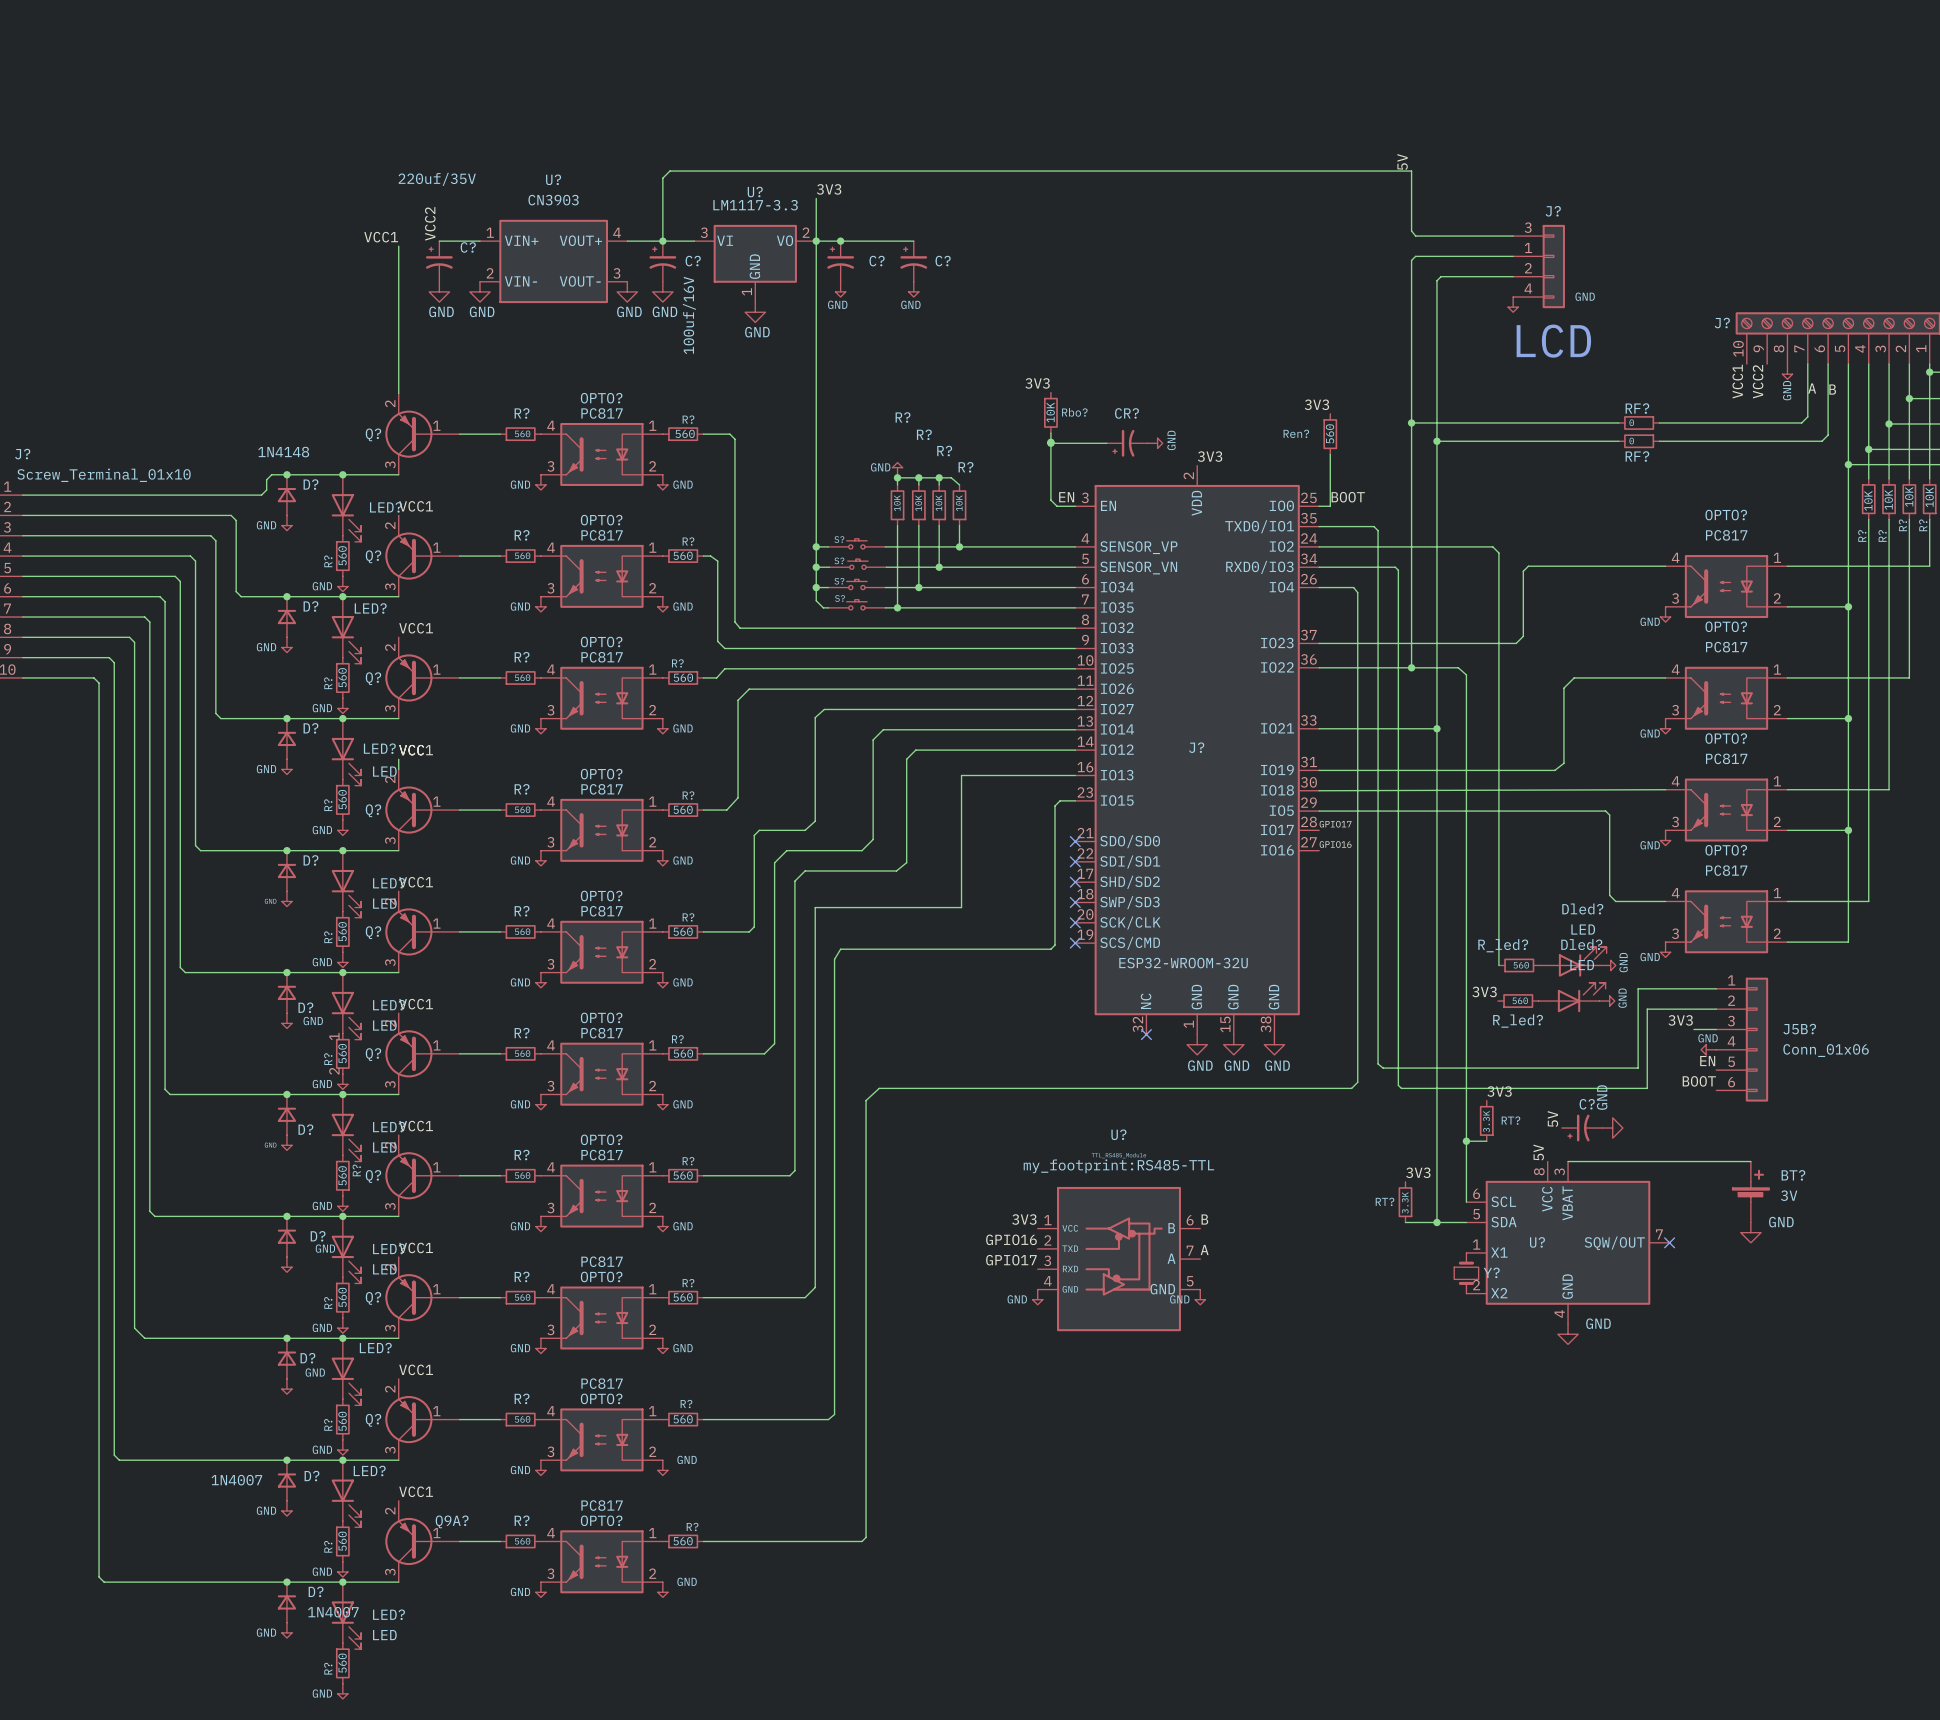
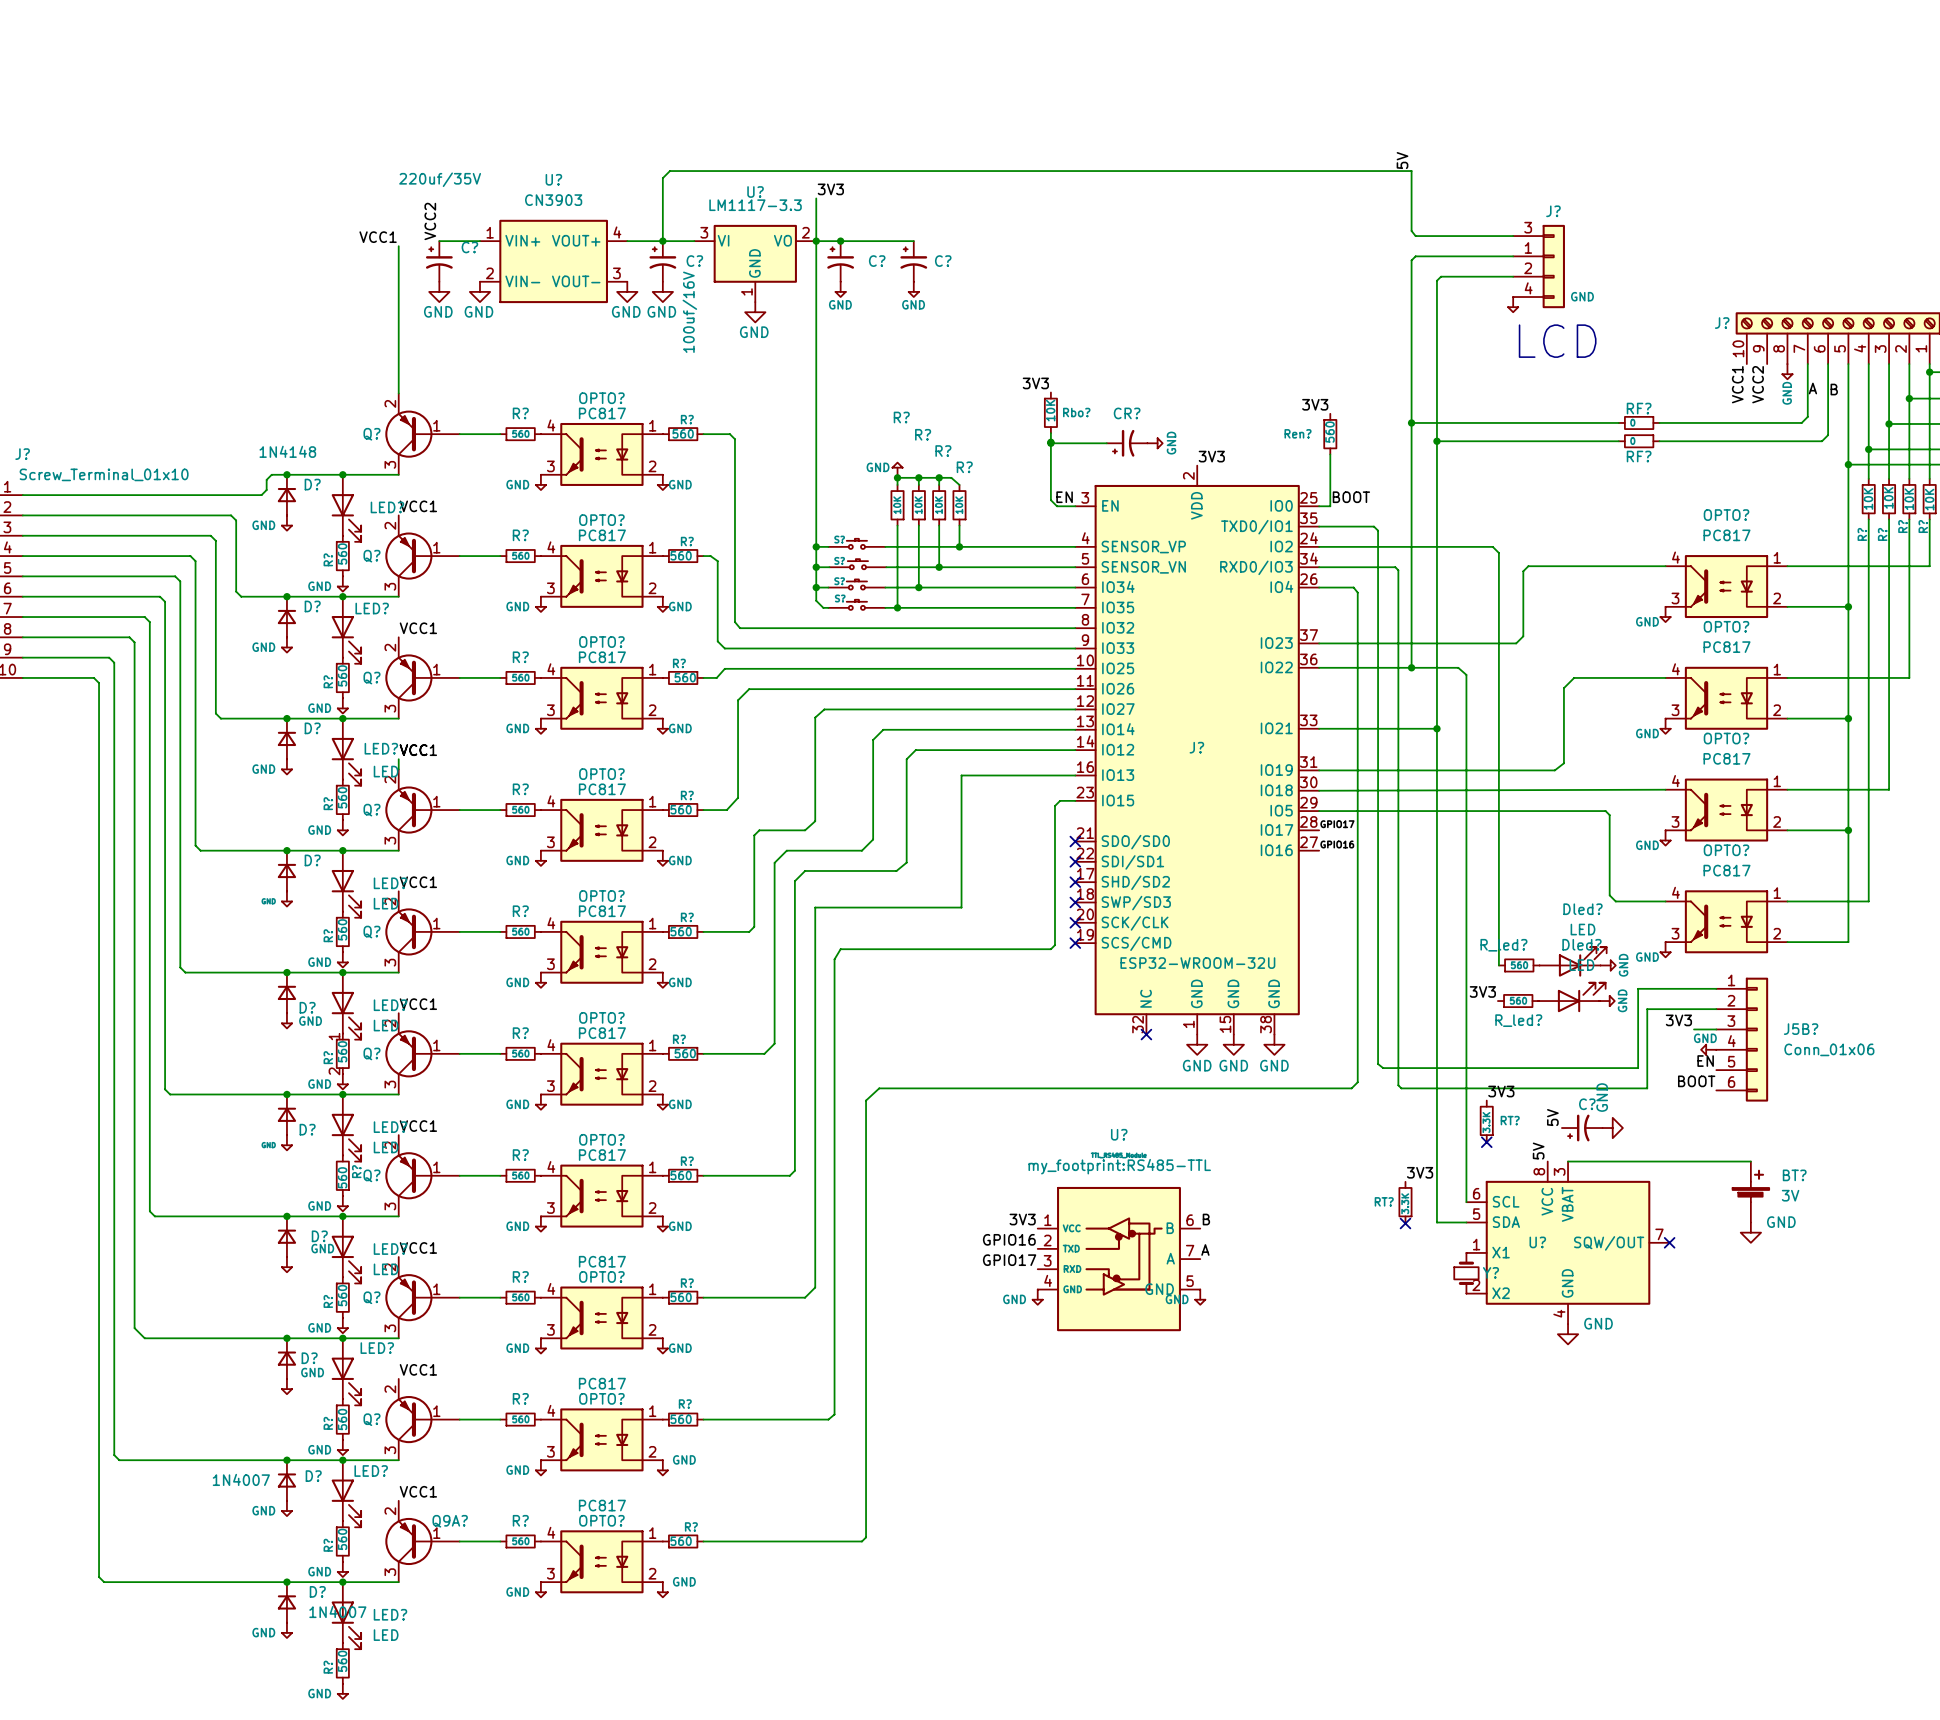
wire: (1466, 1141) (1486, 1141) -> none
junction: (1466, 1141) -> none
no-connect mark: none -> (1486, 1142)
wire: (1405, 1222) (1436, 1222) -> none
junction: (1436, 1222) -> none
no-connect mark: none -> (1405, 1223)

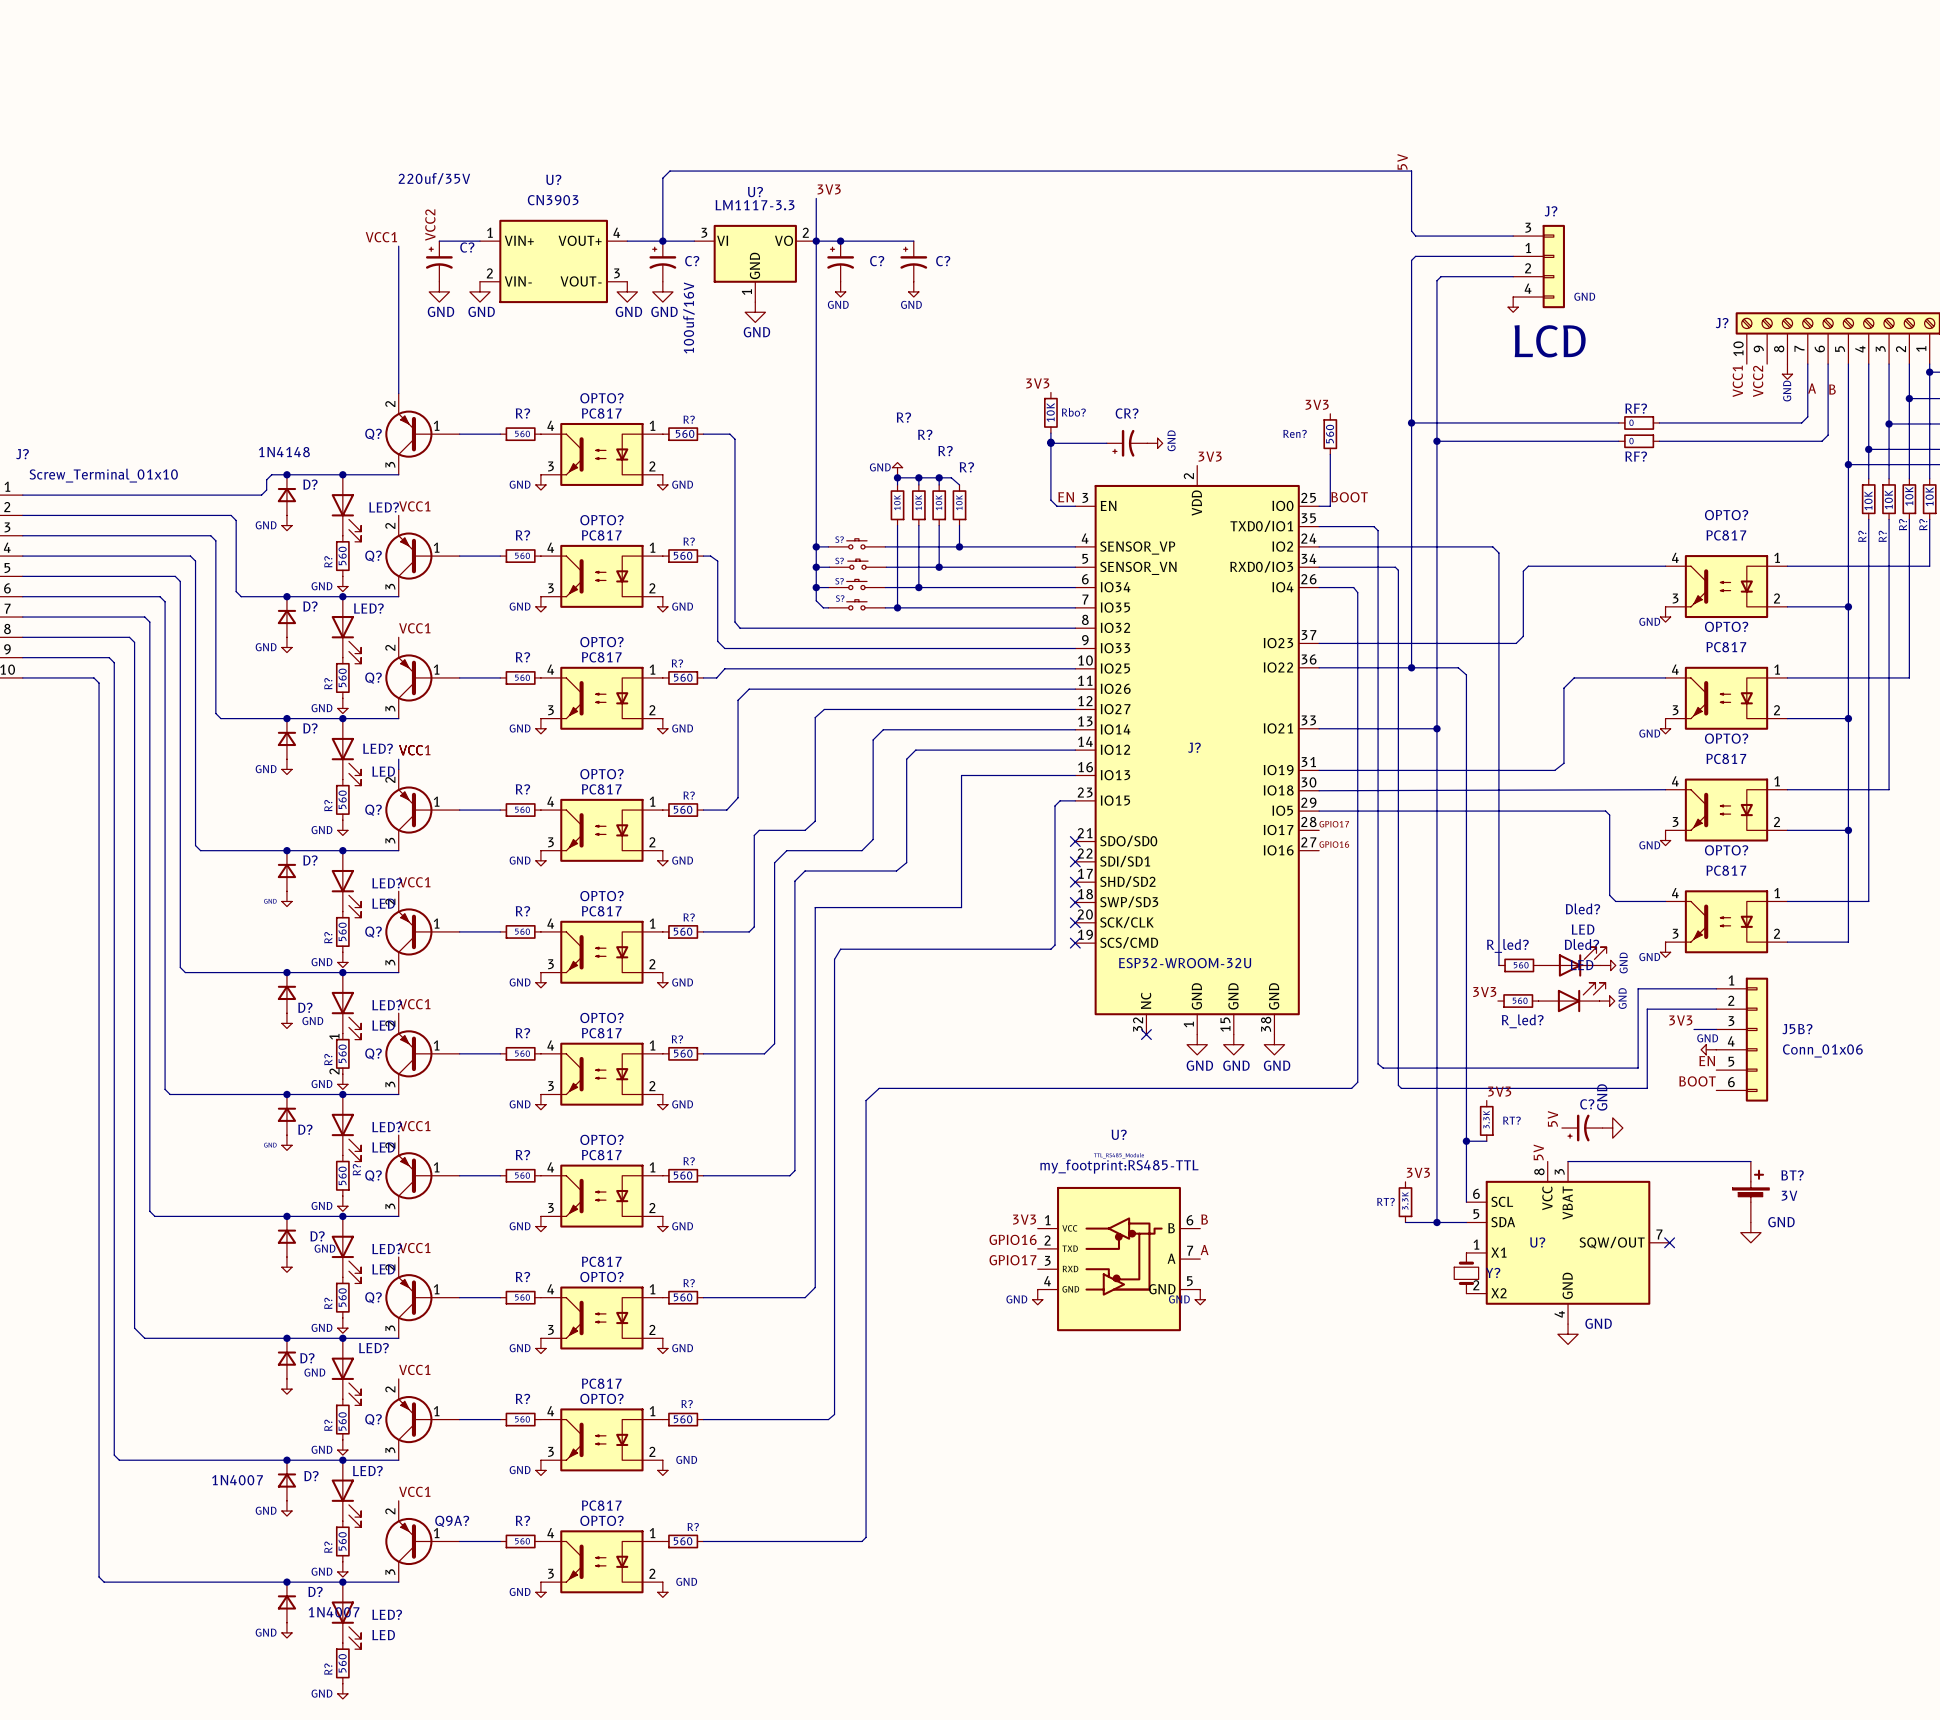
wire: none -> (1466, 1141) (1486, 1141)
junction: none -> (1466, 1141)
no-connect mark: (1486, 1142) -> none
wire: none -> (1405, 1222) (1436, 1222)
junction: none -> (1436, 1222)
no-connect mark: (1405, 1223) -> none

